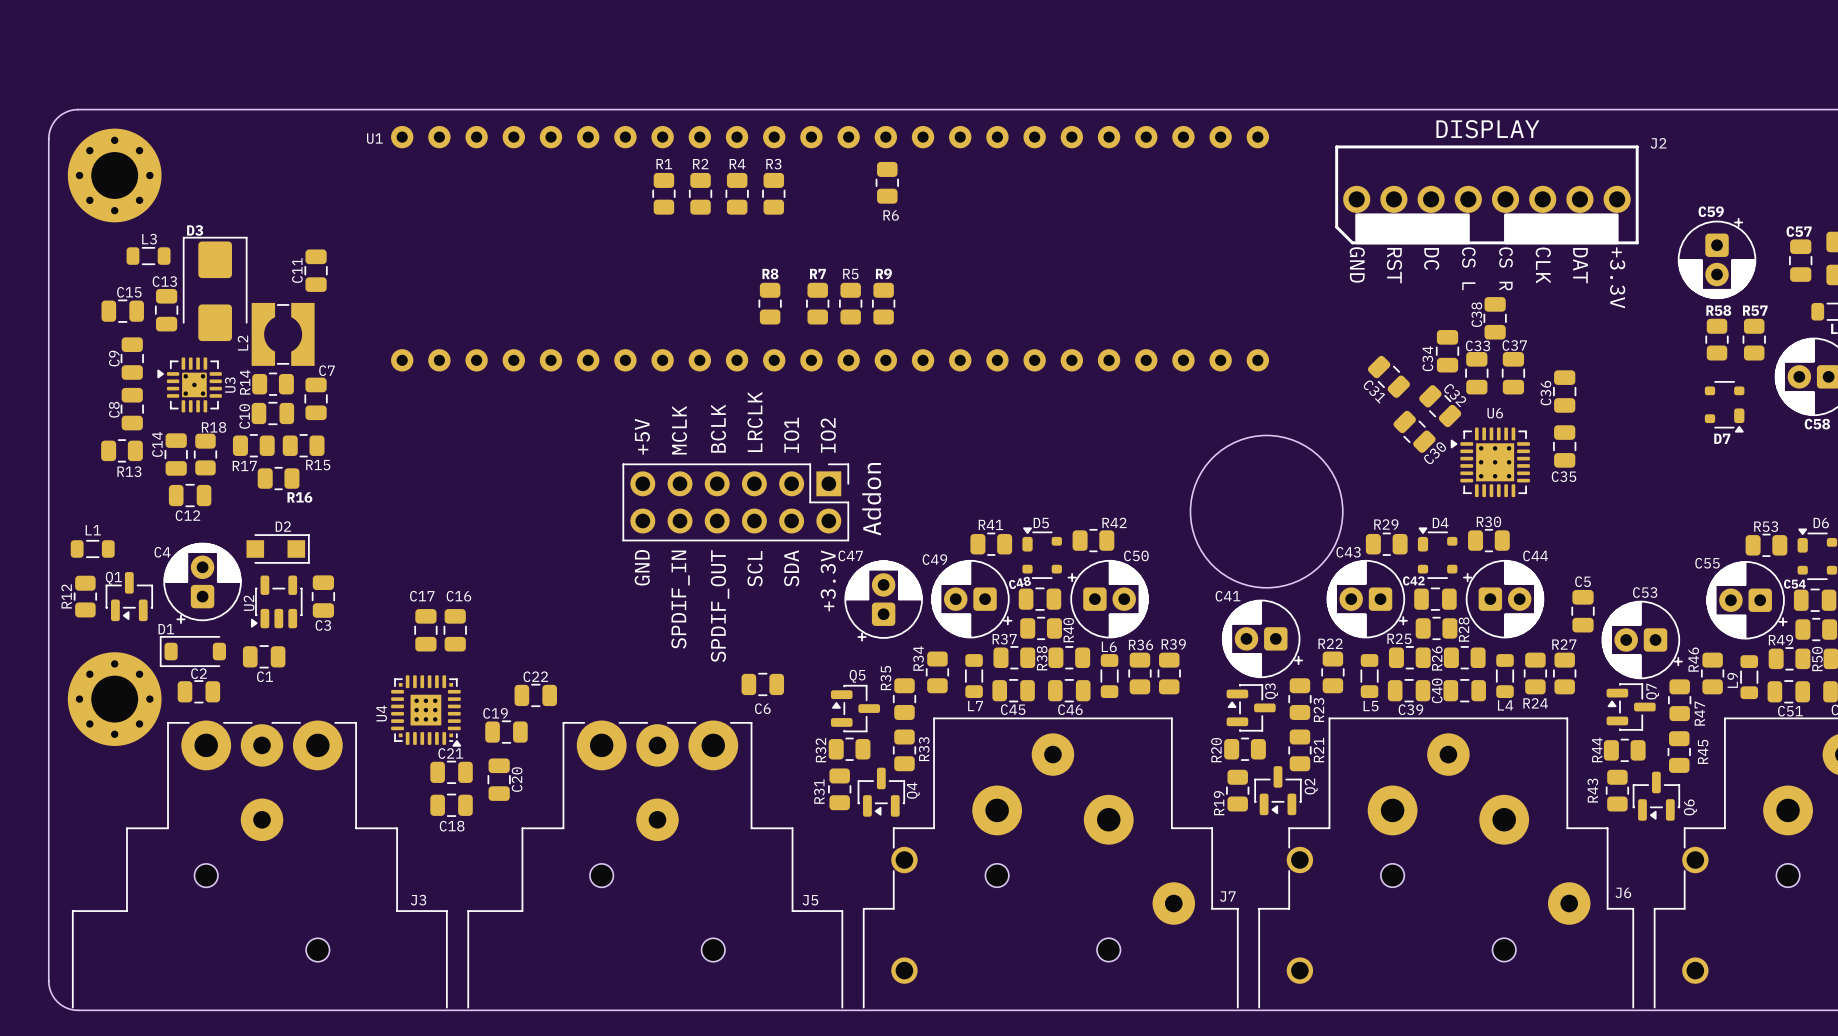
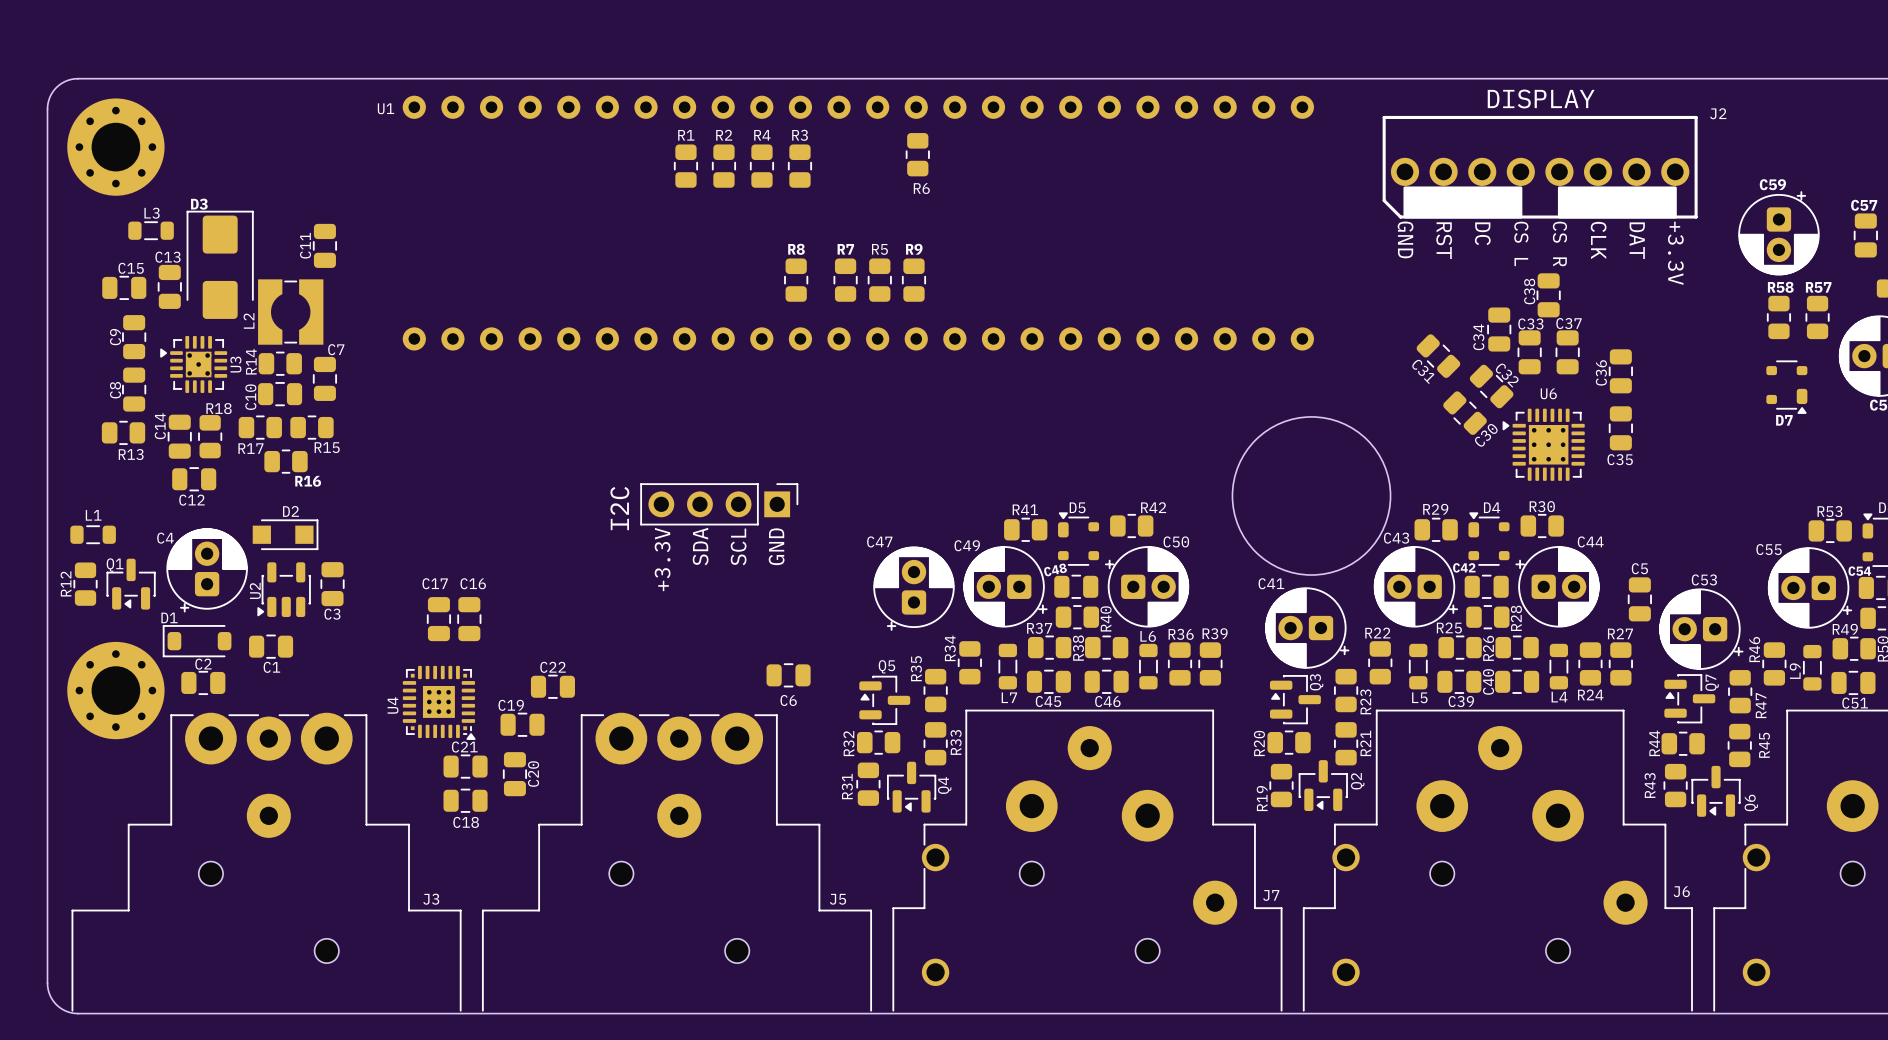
part: (735, 502) -> none
part: none -> (719, 504)

